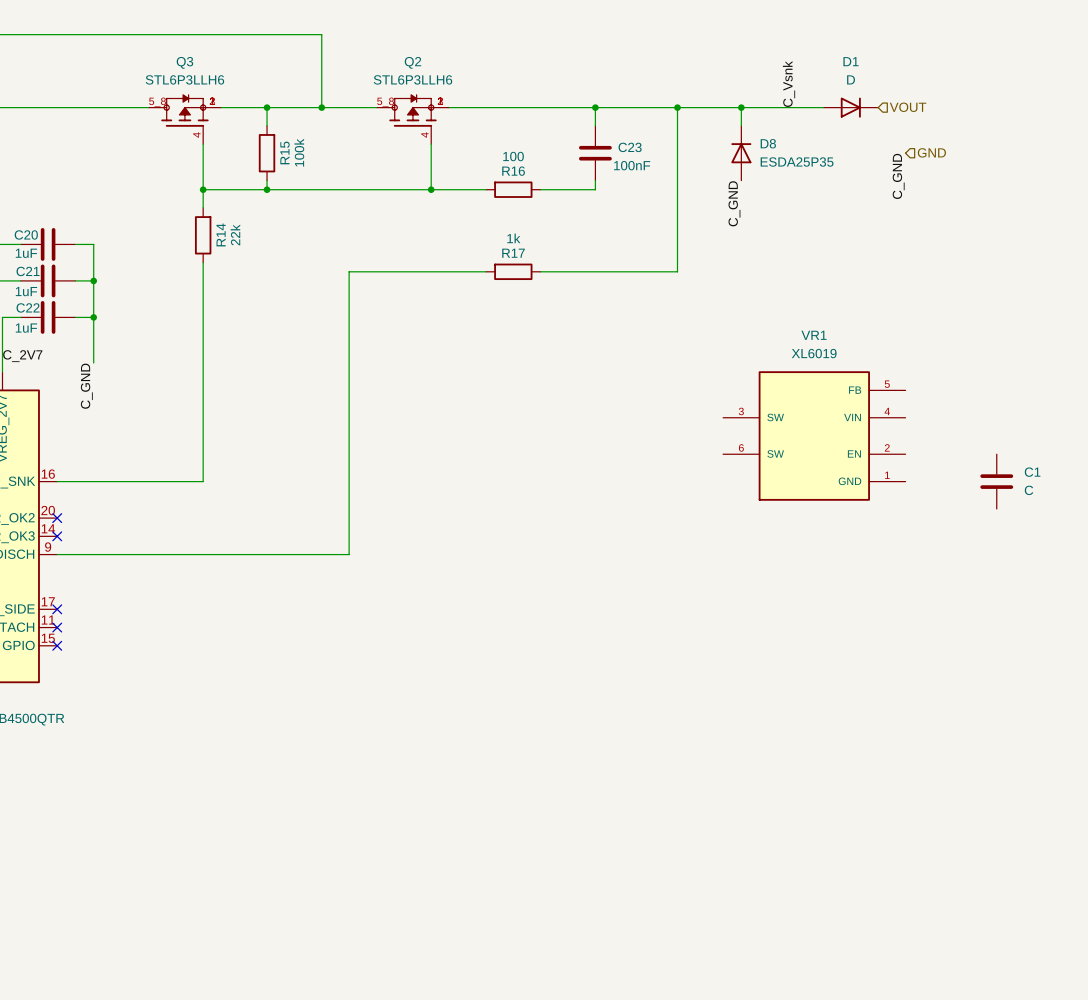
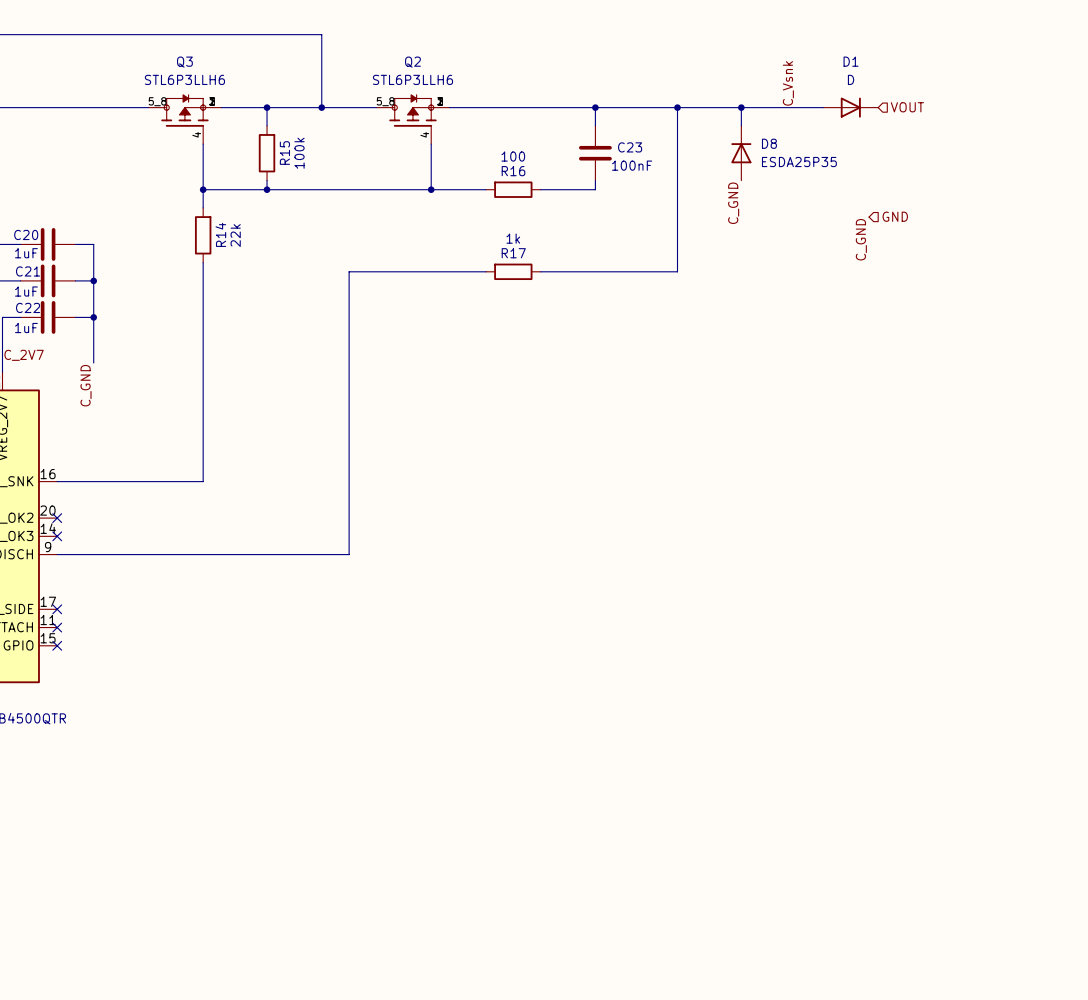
hierarchical label position: GND (931, 152) -> GND (895, 216)
label position: C_GND (898, 176) -> C_GND (861, 239)
VR1: XL6019 (814, 435) -> none
C1: C (996, 481) -> none

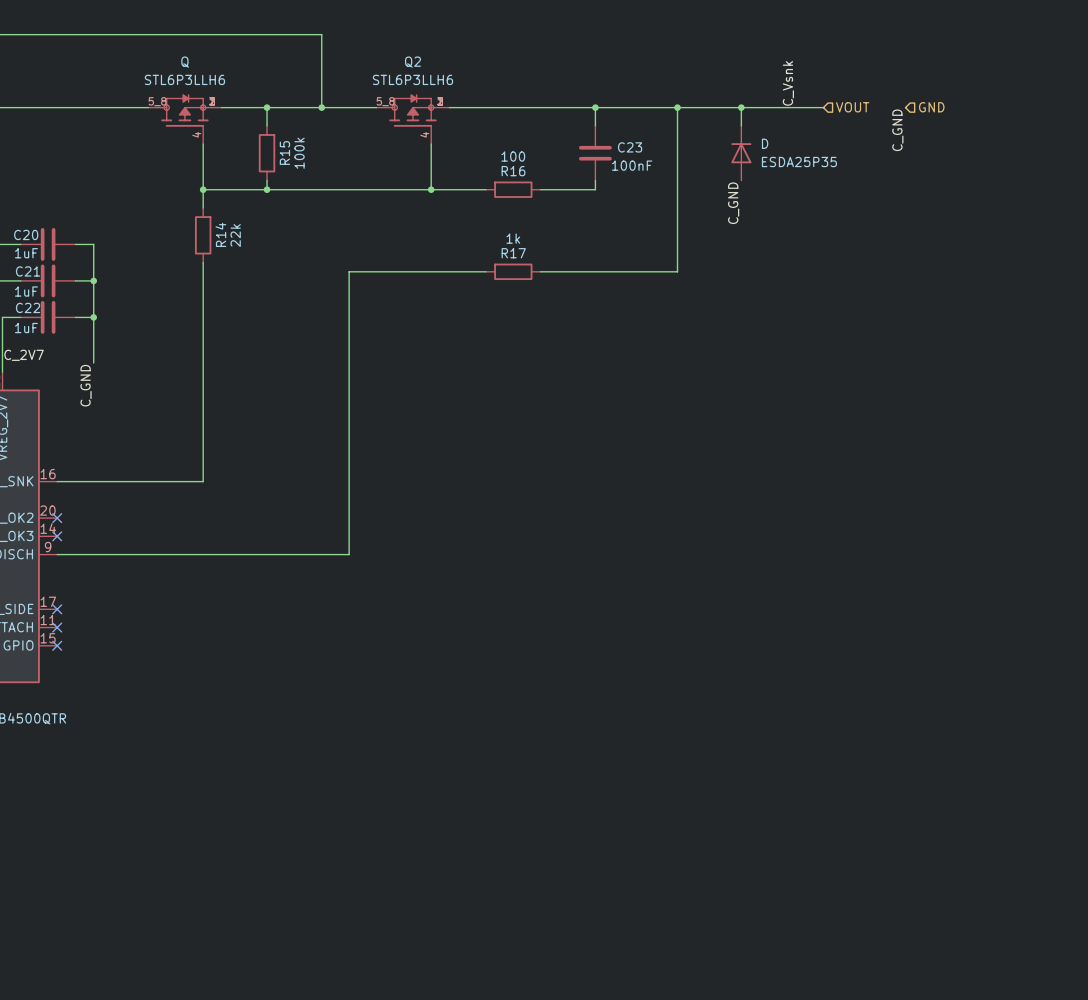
Q3 name: Q3 (184, 62) -> Q (185, 62)
D1: D (850, 107) -> none
hierarchical label position: VOUT (907, 107) -> VOUT (852, 107)
D8 name: D8 (769, 143) -> D (765, 143)
hierarchical label position: GND (895, 216) -> GND (931, 107)
label position: C_GND (861, 239) -> C_GND (897, 130)

